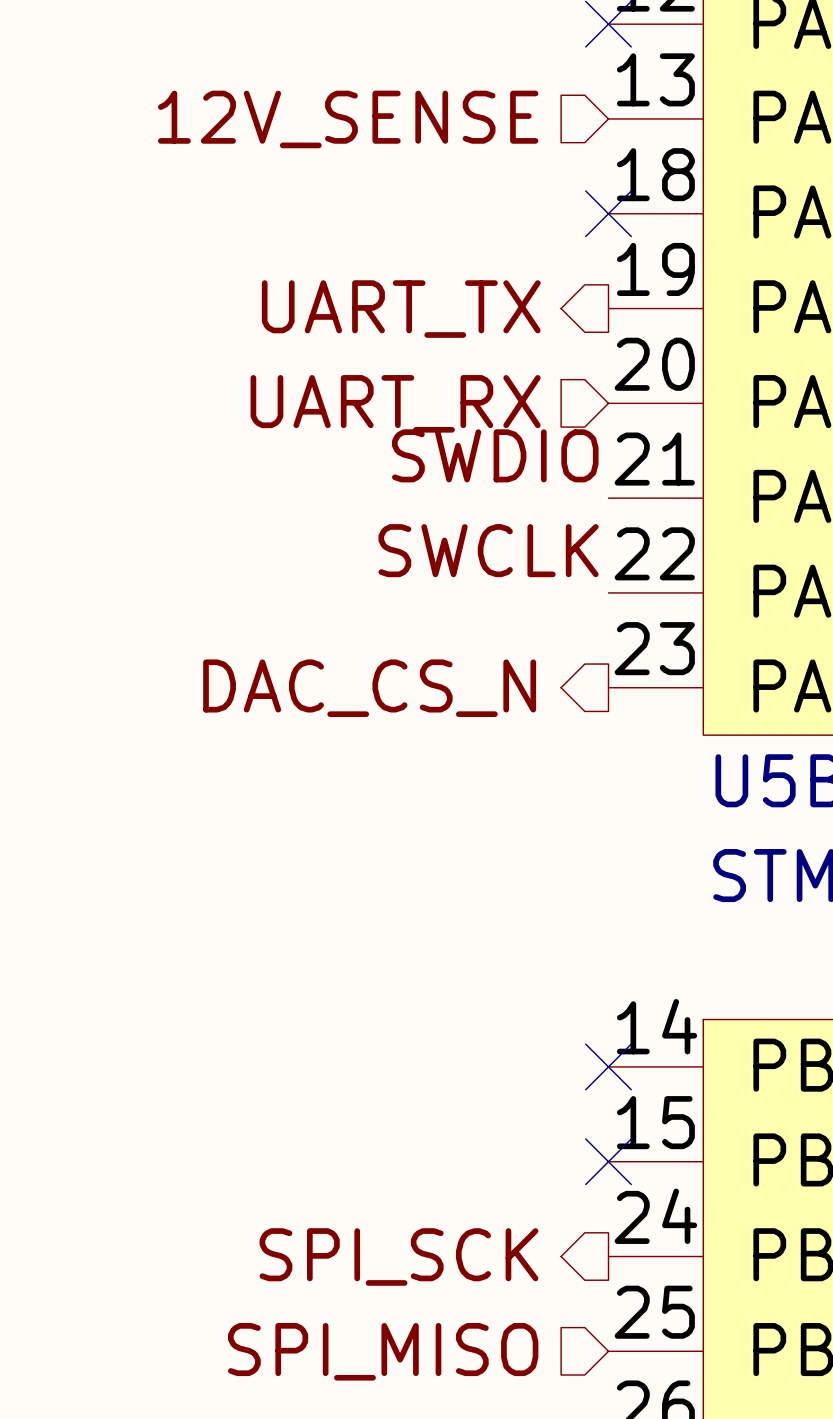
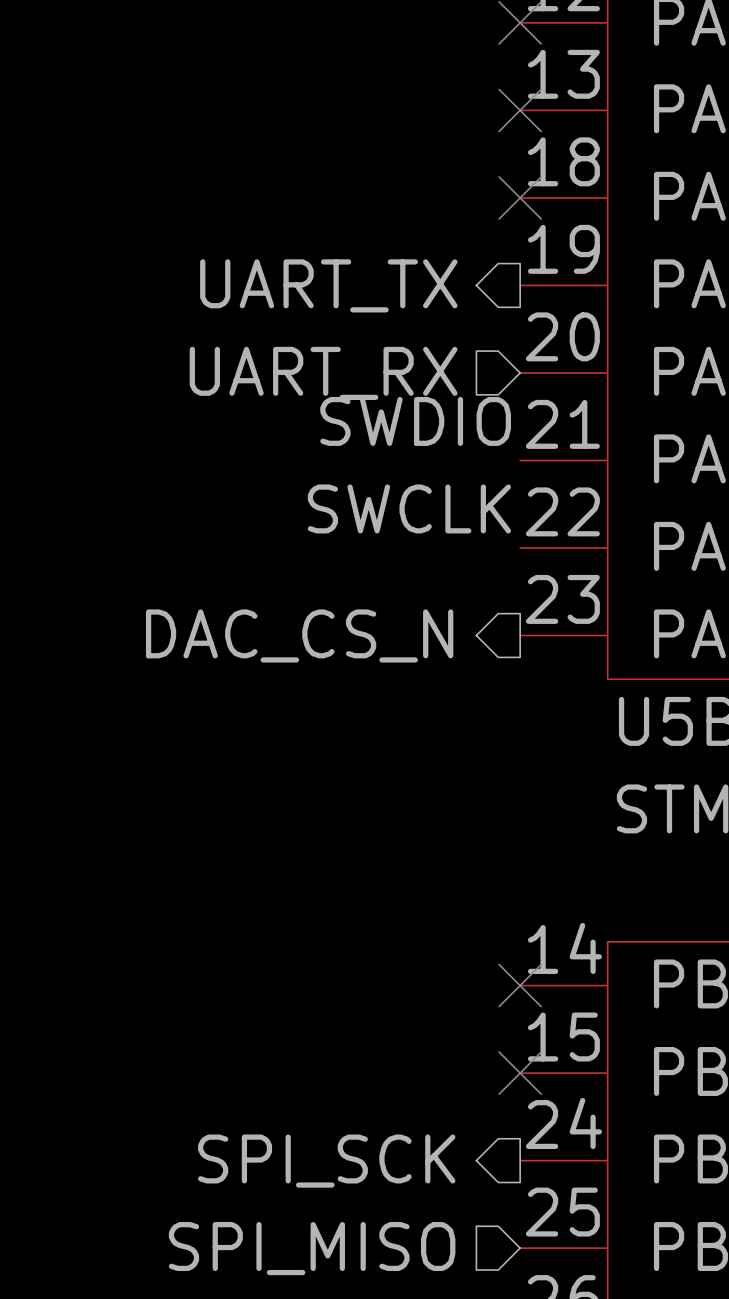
no-connect mark: none -> (520, 110)
hierarchical label: 12V_SENSE (348, 119) -> none

